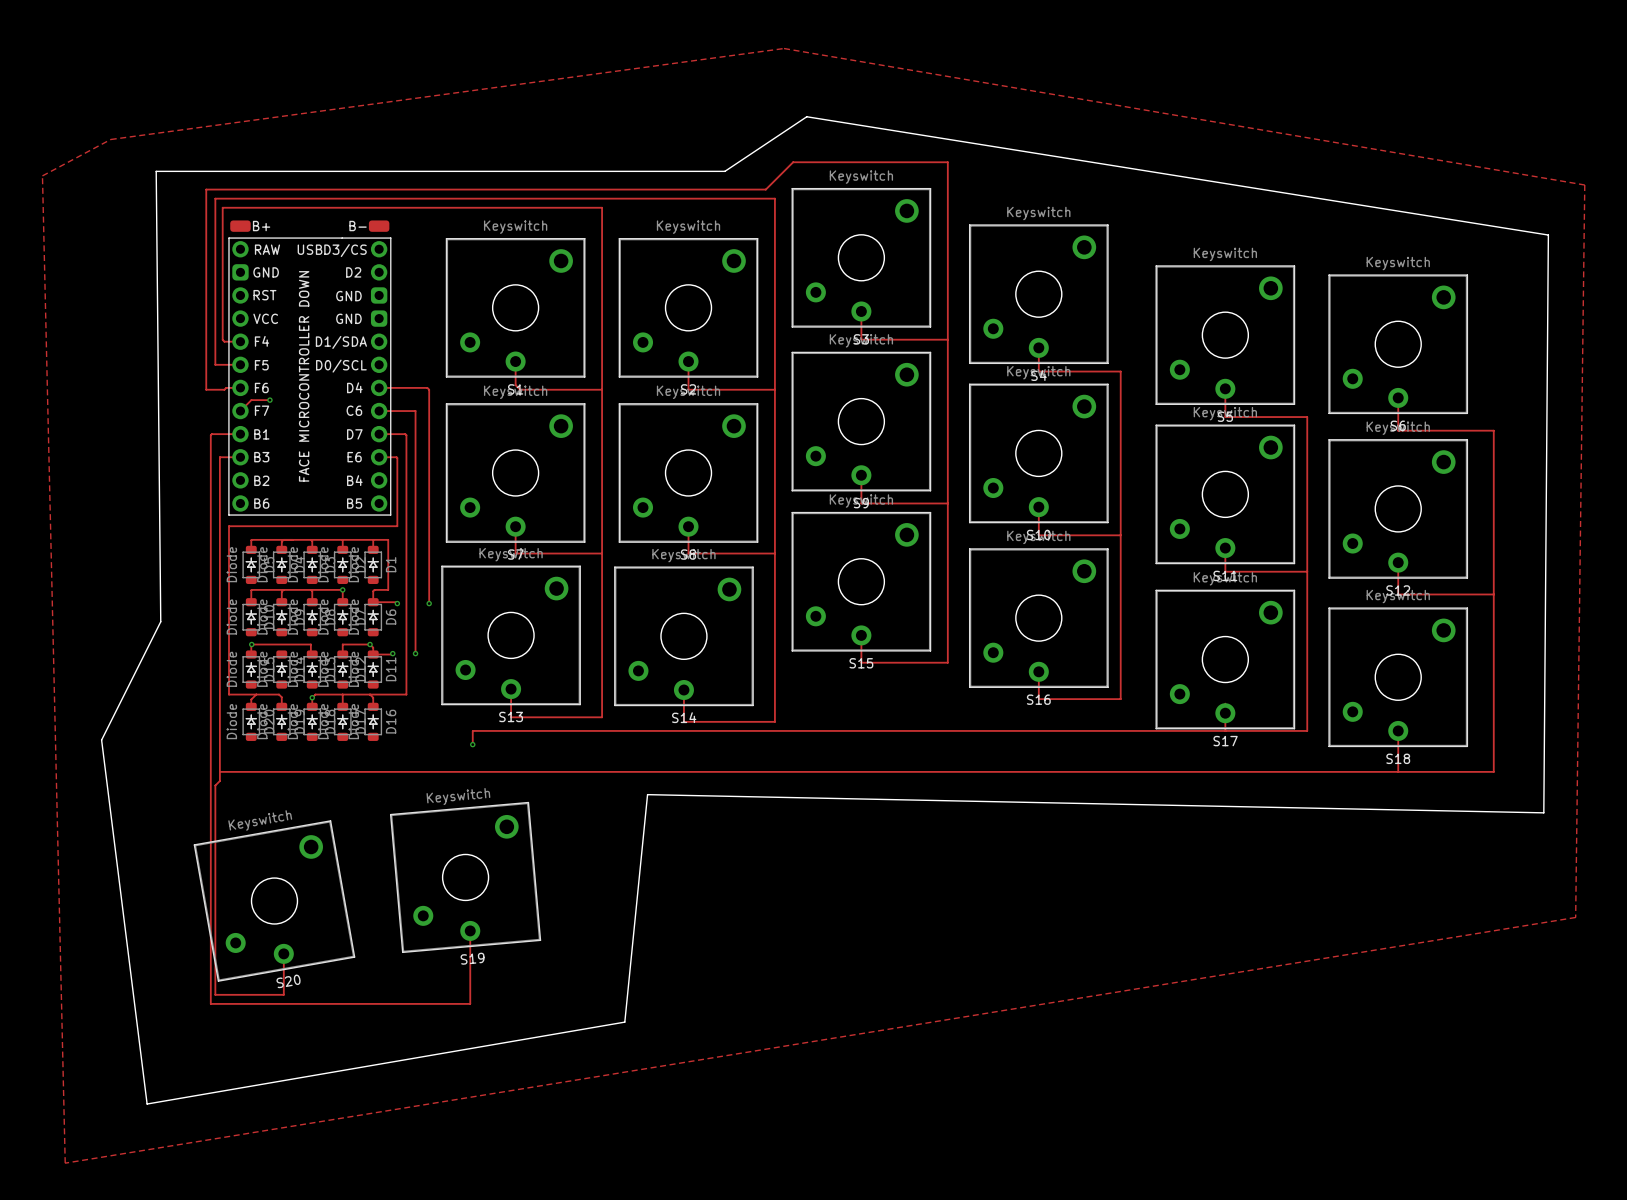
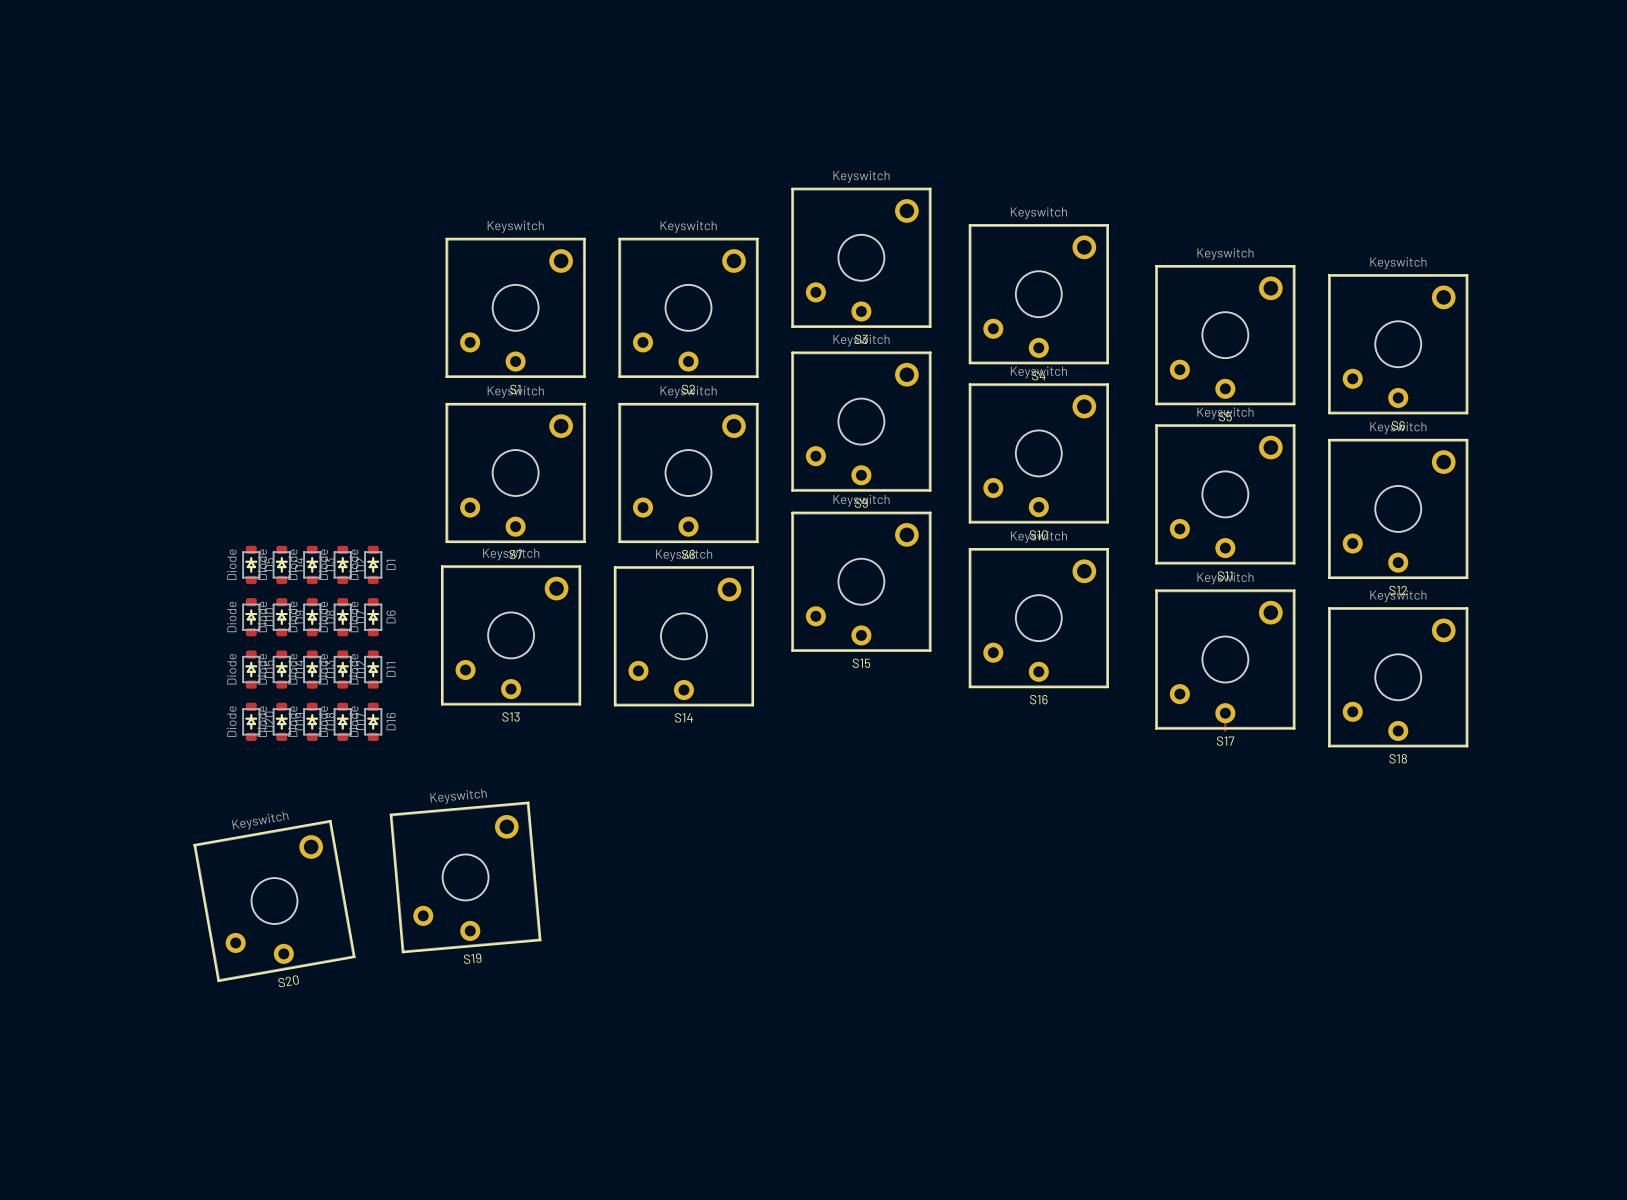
zone outline: (784, 48) (110, 139) (42, 175) (65, 1163) (1575, 917) (1584, 185) (784, 48) -> none
board edge: (806, 116) (724, 171) (156, 171) (160, 621) (101, 740) (147, 1104) (624, 1022) (647, 794) (1543, 812) (1548, 235) (806, 116) -> none
track: (861, 311) (861, 339) (947, 339) -> none
track: (240, 341) (224, 341) (222, 339) (222, 207) (602, 207) (602, 717) (511, 717) (511, 689) -> none
track: (1038, 347) (1038, 371) (1120, 371) (1120, 699) (1038, 699) (1038, 671) -> none
track: (515, 361) (515, 385) (520, 389) (602, 389) -> none
track: (688, 361) (688, 389) (774, 389) -> none
track: (240, 364) (215, 364) (215, 198) (774, 198) (774, 721) (683, 721) (683, 690) -> none
part: (309, 368) -> none
track: (240, 387) (206, 389) (206, 189) (765, 189) (793, 162) (947, 162) (947, 662) (861, 662) (861, 635) -> none
track: (379, 387) (427, 387) (429, 389) (429, 603) -> none
track: (1225, 388) (1225, 417) (1307, 417) (1307, 730) (473, 730) (472, 744) -> none
track: (1398, 397) (1398, 430) (1493, 430) (1493, 771) (219, 771) -> none
track: (269, 400) (251, 400) (240, 411) -> none
via: (269, 400) -> none
track: (379, 411) (415, 411) (415, 653) -> none
track: (238, 430) (240, 434) (210, 435) (210, 1003) (470, 1003) (470, 930) -> none
track: (379, 434) (406, 435) (406, 694) (315, 694) (312, 697) (312, 706) -> none
track: (240, 457) (219, 457) (219, 781) (215, 785) (215, 994) (283, 994) (283, 953) -> none
track: (379, 457) (397, 457) (397, 526) (229, 526) (229, 694) (279, 694) (281, 697) (281, 706) -> none
track: (861, 475) (861, 503) (947, 503) -> none
track: (1038, 507) (1038, 535) (1120, 535) -> none
track: (515, 526) (515, 553) (602, 553) -> none
track: (688, 526) (688, 553) (774, 553) -> none
track: (283, 539) (281, 549) -> none
track: (310, 539) (312, 549) -> none
track: (342, 539) (342, 549) -> none
track: (373, 539) (373, 549) -> none
track: (1225, 548) (1225, 571) (1307, 571) -> none
track: (251, 549) (251, 539) (388, 539) (388, 589) (374, 589) (373, 602) (397, 603) -> none
track: (1398, 562) (1398, 594) (1493, 594) -> none
track: (283, 589) (281, 591) (281, 602) -> none
track: (310, 589) (312, 602) -> none
via: (342, 589) -> none
track: (251, 602) (251, 589) (342, 589) (342, 602) -> none
via: (397, 603) -> none
via: (429, 603) -> none
via: (251, 644) -> none
via: (370, 644) -> none
track: (310, 653) (310, 644) (251, 644) (251, 654) -> none
track: (392, 653) (373, 654) (373, 647) (370, 644) (342, 644) (342, 654) -> none
via: (392, 653) -> none
via: (415, 653) -> none
track: (256, 694) (251, 699) (251, 706) -> none
track: (342, 694) (342, 706) -> none
track: (370, 694) (373, 697) (373, 706) -> none
via: (312, 697) -> none
track: (1398, 730) (1398, 771) -> none
via: (472, 744) -> none

